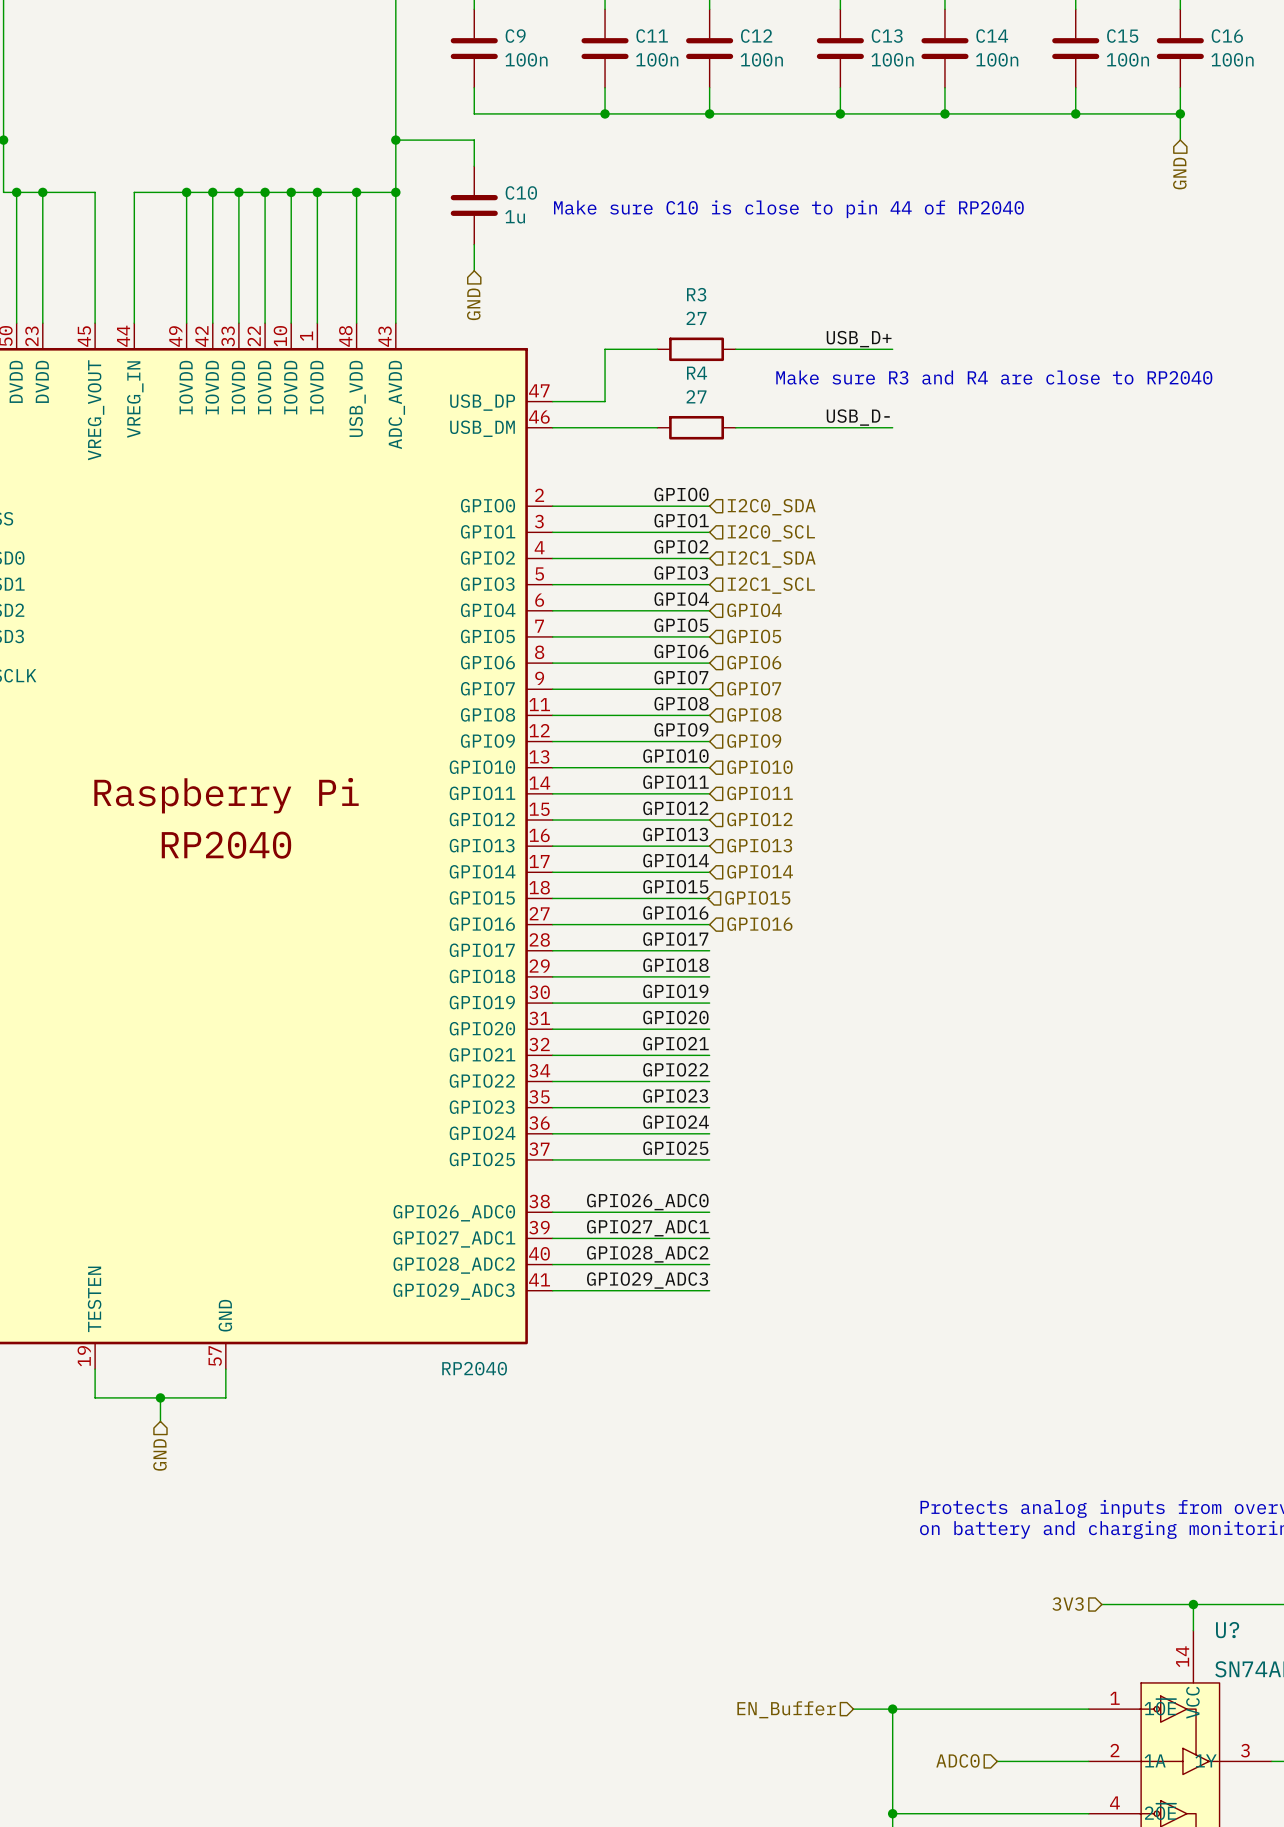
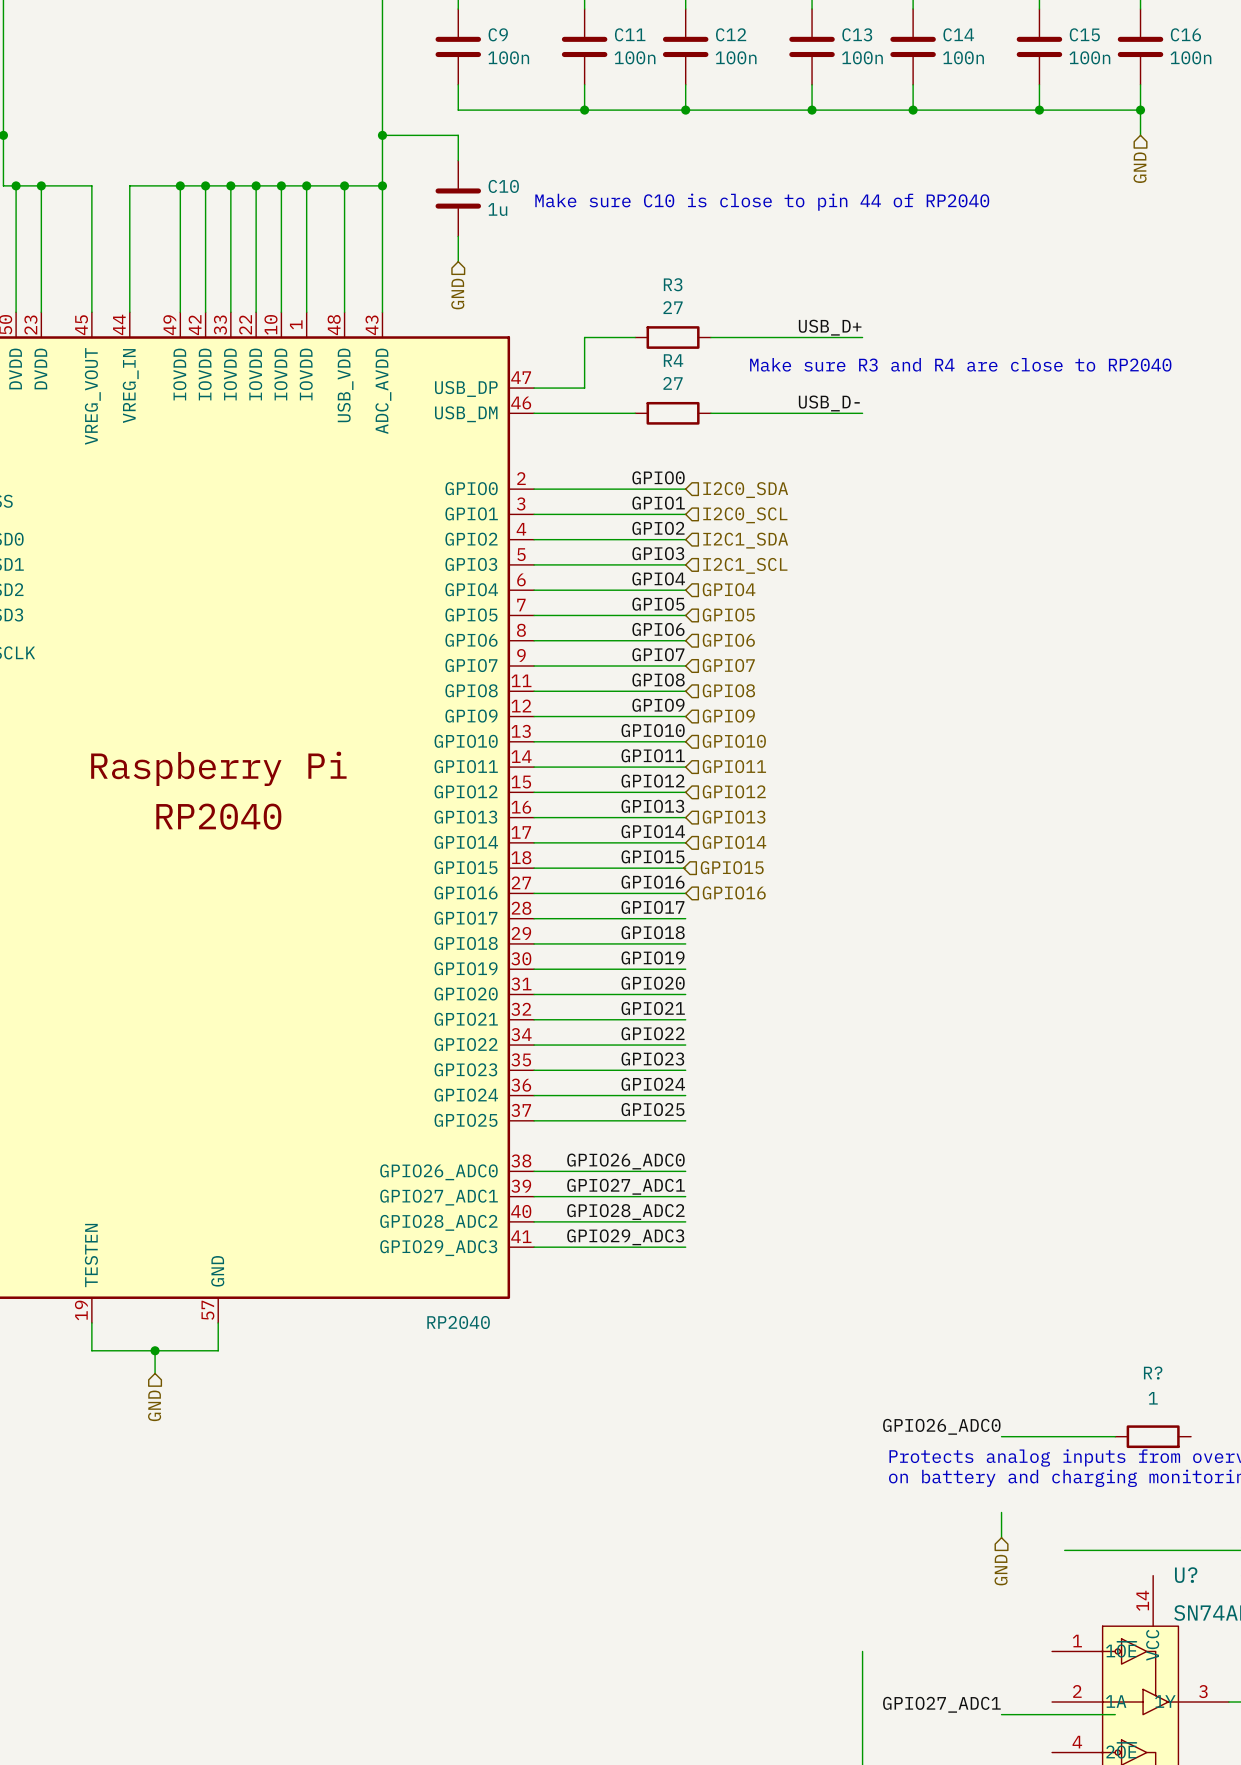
label: none -> GPIO26_ADC0 (941, 1426)
wire: none -> (1001, 1436) (1115, 1436)
R?: none -> 1 (1153, 1436)
hierarchical label: 3V3 (1068, 1604) -> none
wire: (1193, 1604) (1193, 1630) -> (1001, 1512) (1001, 1537)
junction: (1193, 1604) -> none
hierarchical label: none -> GND (1001, 1570)
hierarchical label: EN_Buffer (786, 1709) -> none
wire: (853, 1709) (1088, 1709) -> none
junction: (892, 1709) -> none
hierarchical label: ADC0 (957, 1760) -> none
wire: (997, 1761) (1088, 1761) -> none
label: none -> GPIO27_ADC1 (941, 1704)
wire: none -> (1001, 1714) (1115, 1714)
wire: (892, 1813) (1088, 1813) -> none
junction: (892, 1813) -> none

